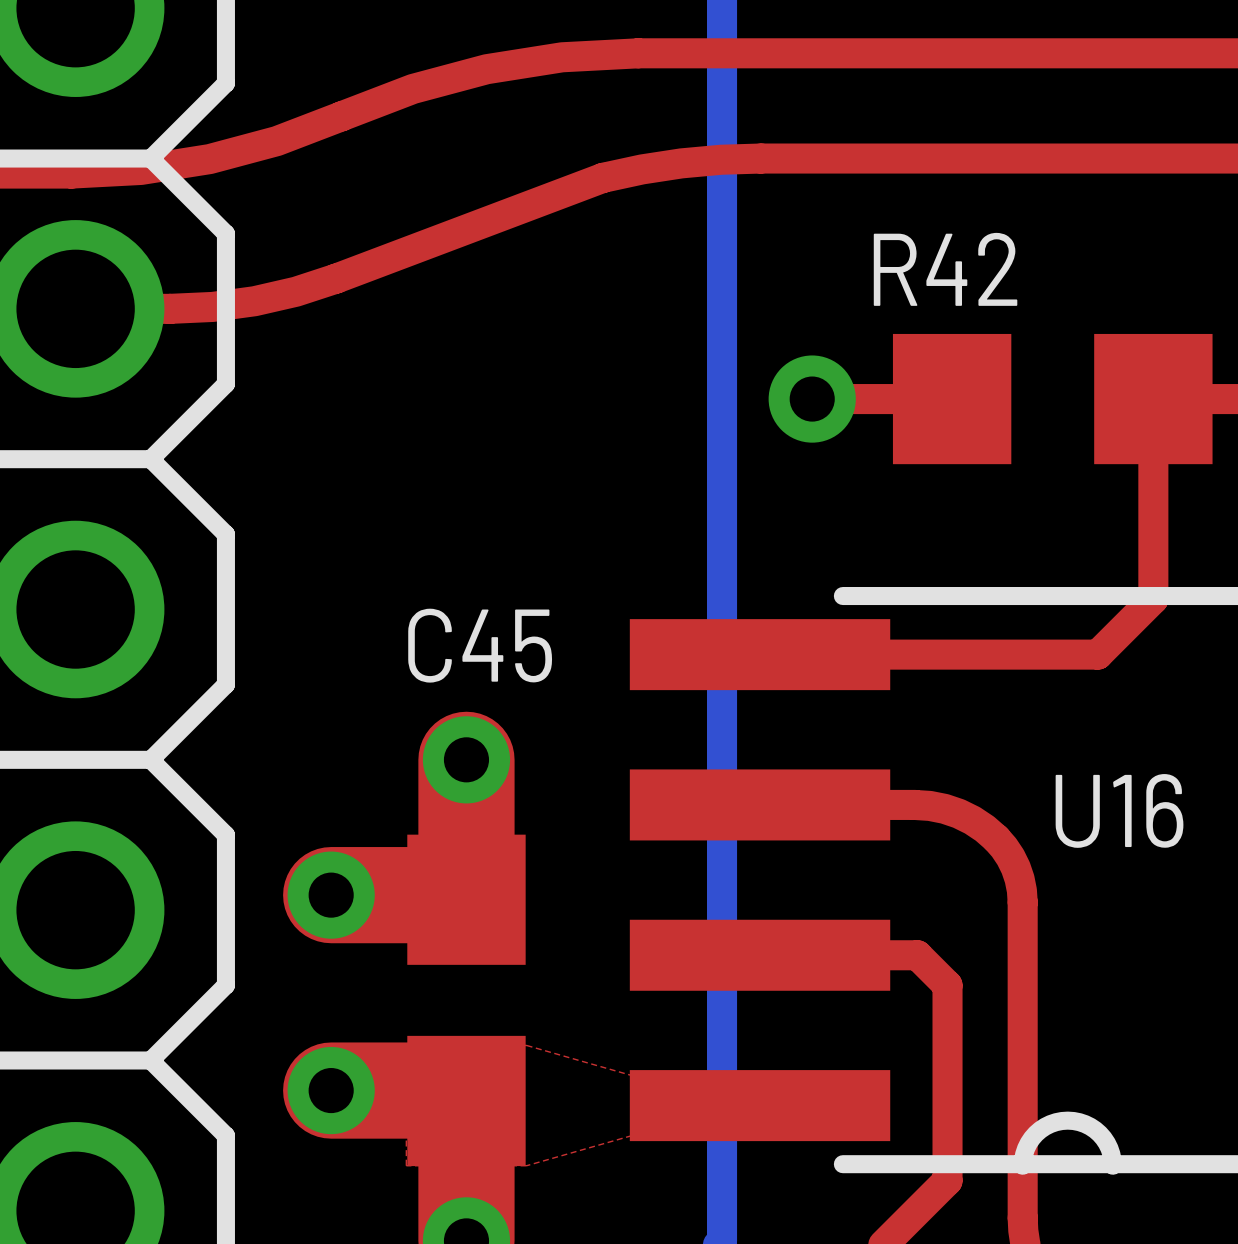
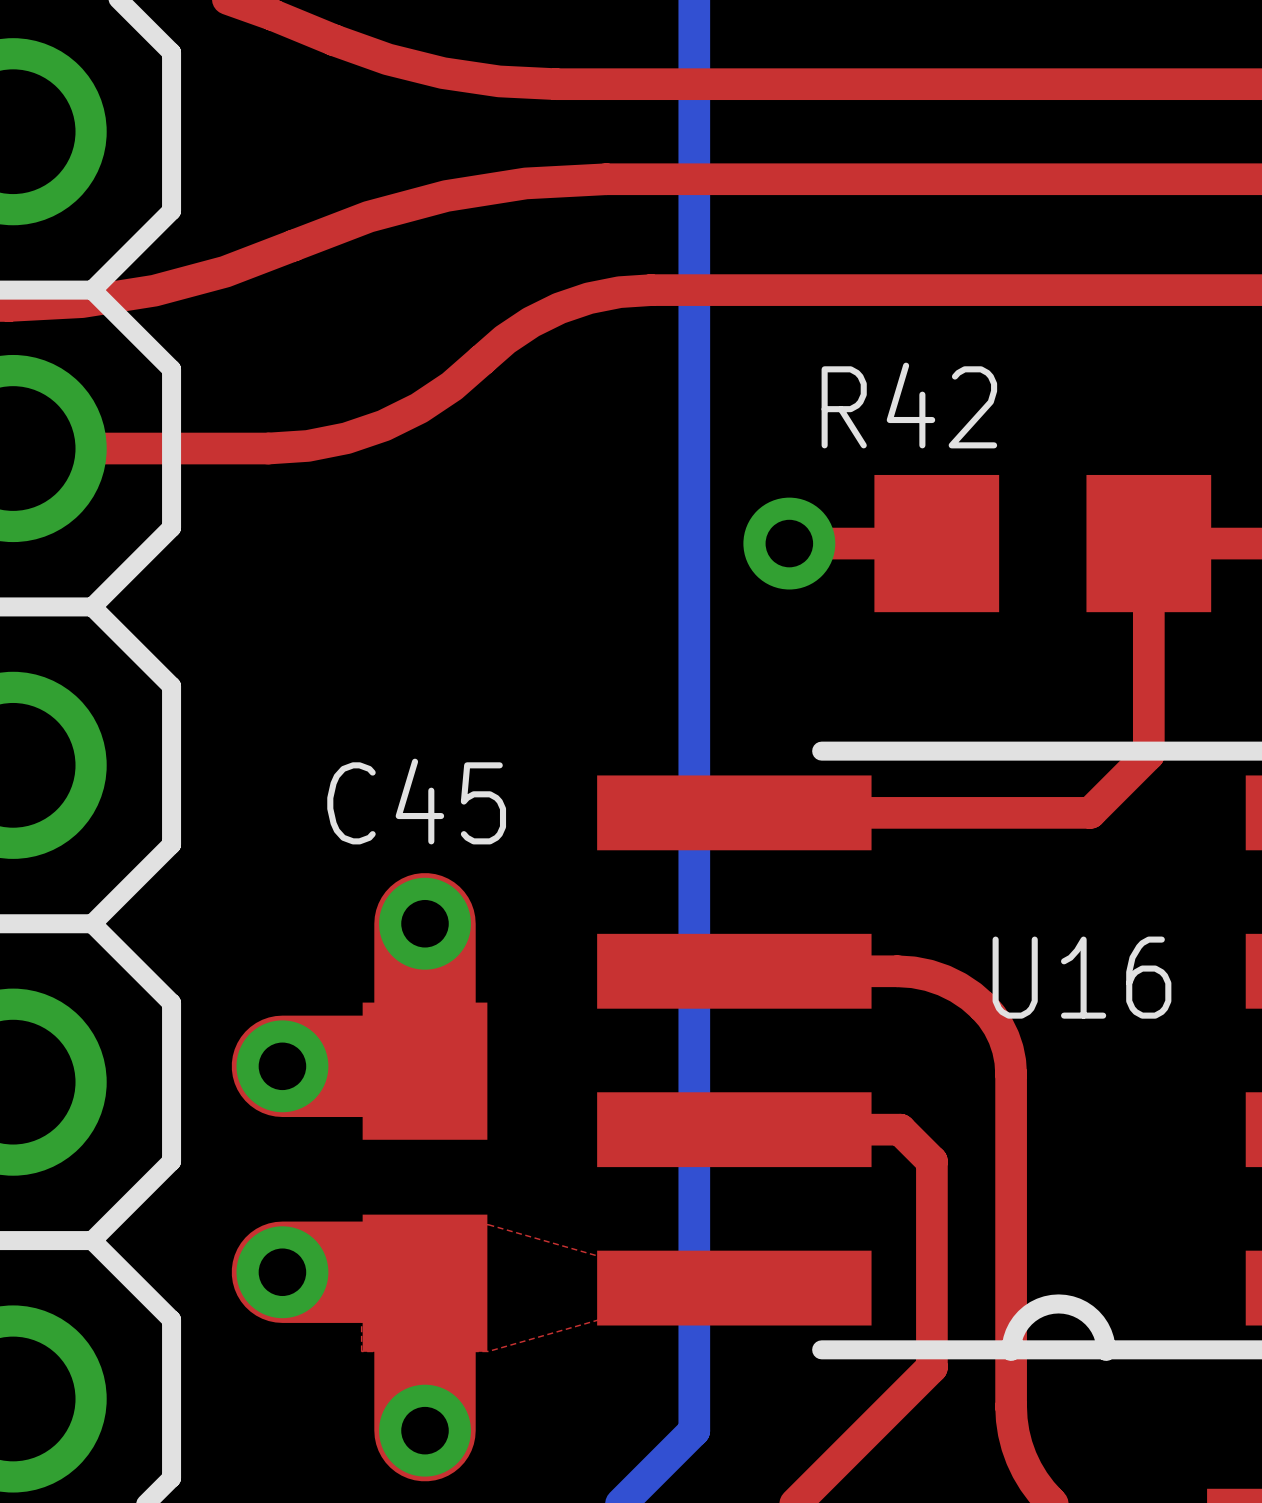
top track: (761, 158) (681, 163) (603, 177) (336, 278) (296, 291) (254, 301) (212, 306) (170, 308) -> (735, 290) (619, 292) (588, 298) (559, 308) (531, 322) (505, 339) (451, 386) (419, 408) (383, 425) (346, 438) (307, 445) (268, 448) (112, 448)

